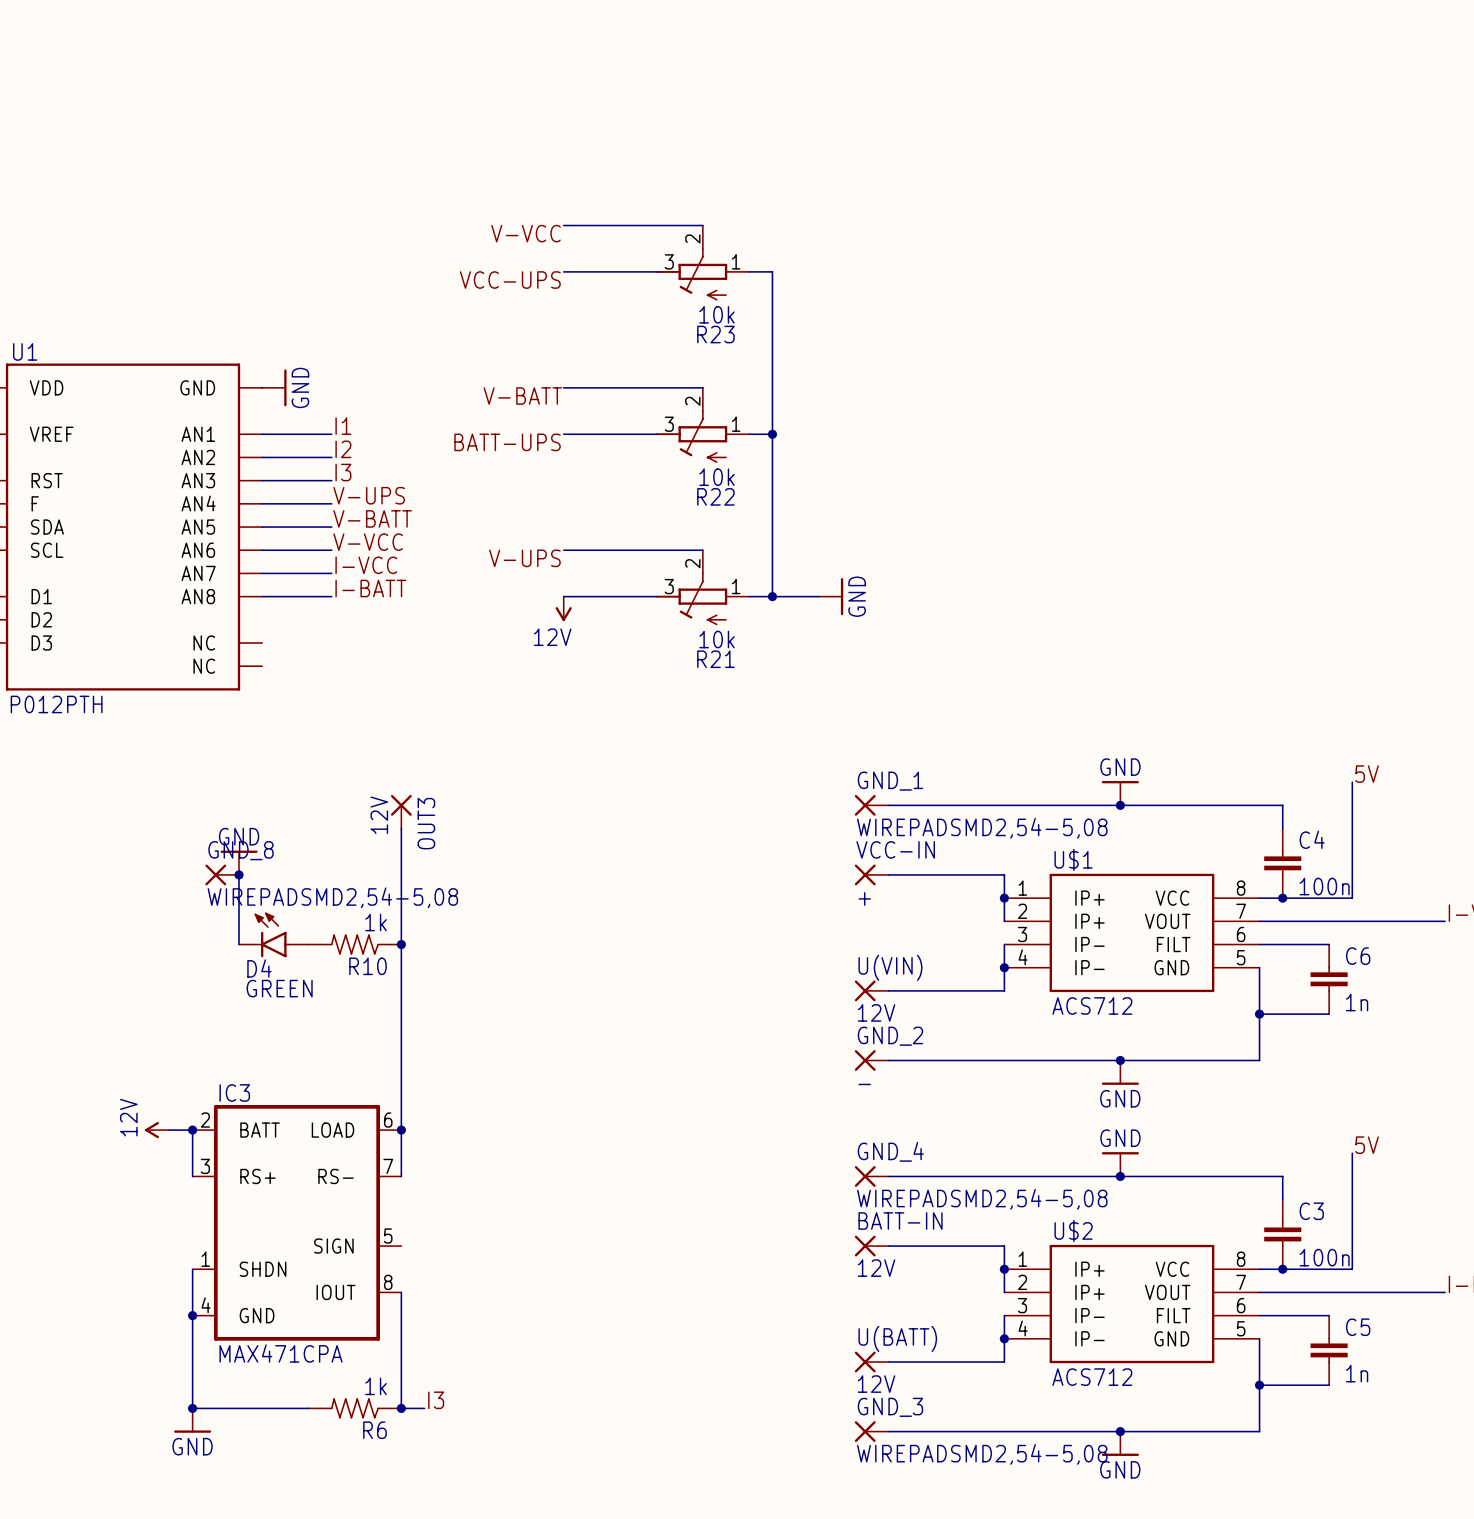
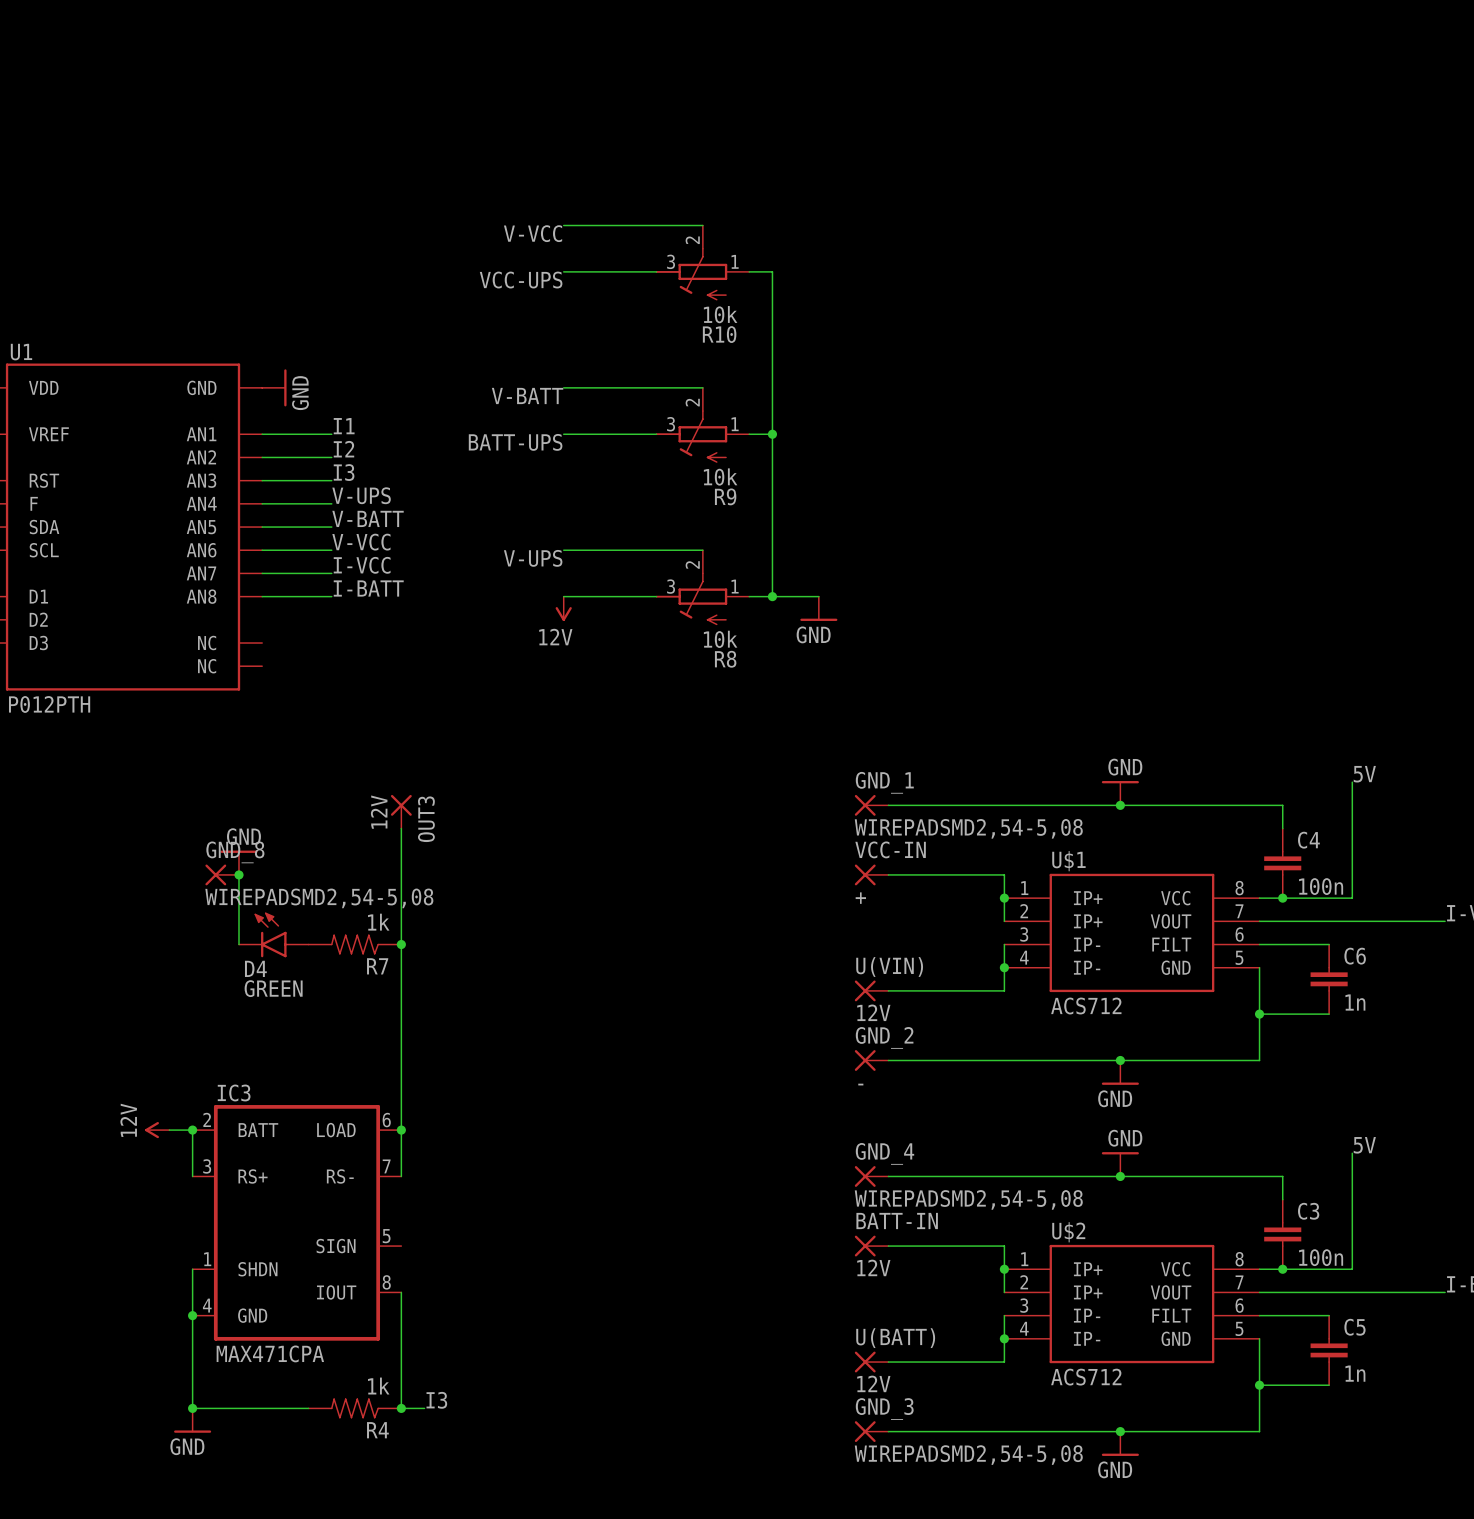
R23 name: R23 (715, 334) -> R10 (719, 334)
R22 name: R22 (715, 496) -> R9 (725, 496)
power symbol rotation: 0° (842, 596) -> 90° clockwise (818, 619)
R21 name: R21 (715, 659) -> R8 (725, 659)
R10 name: R10 (368, 966) -> R7 (377, 966)
R6 name: R6 (374, 1430) -> R4 (377, 1430)

